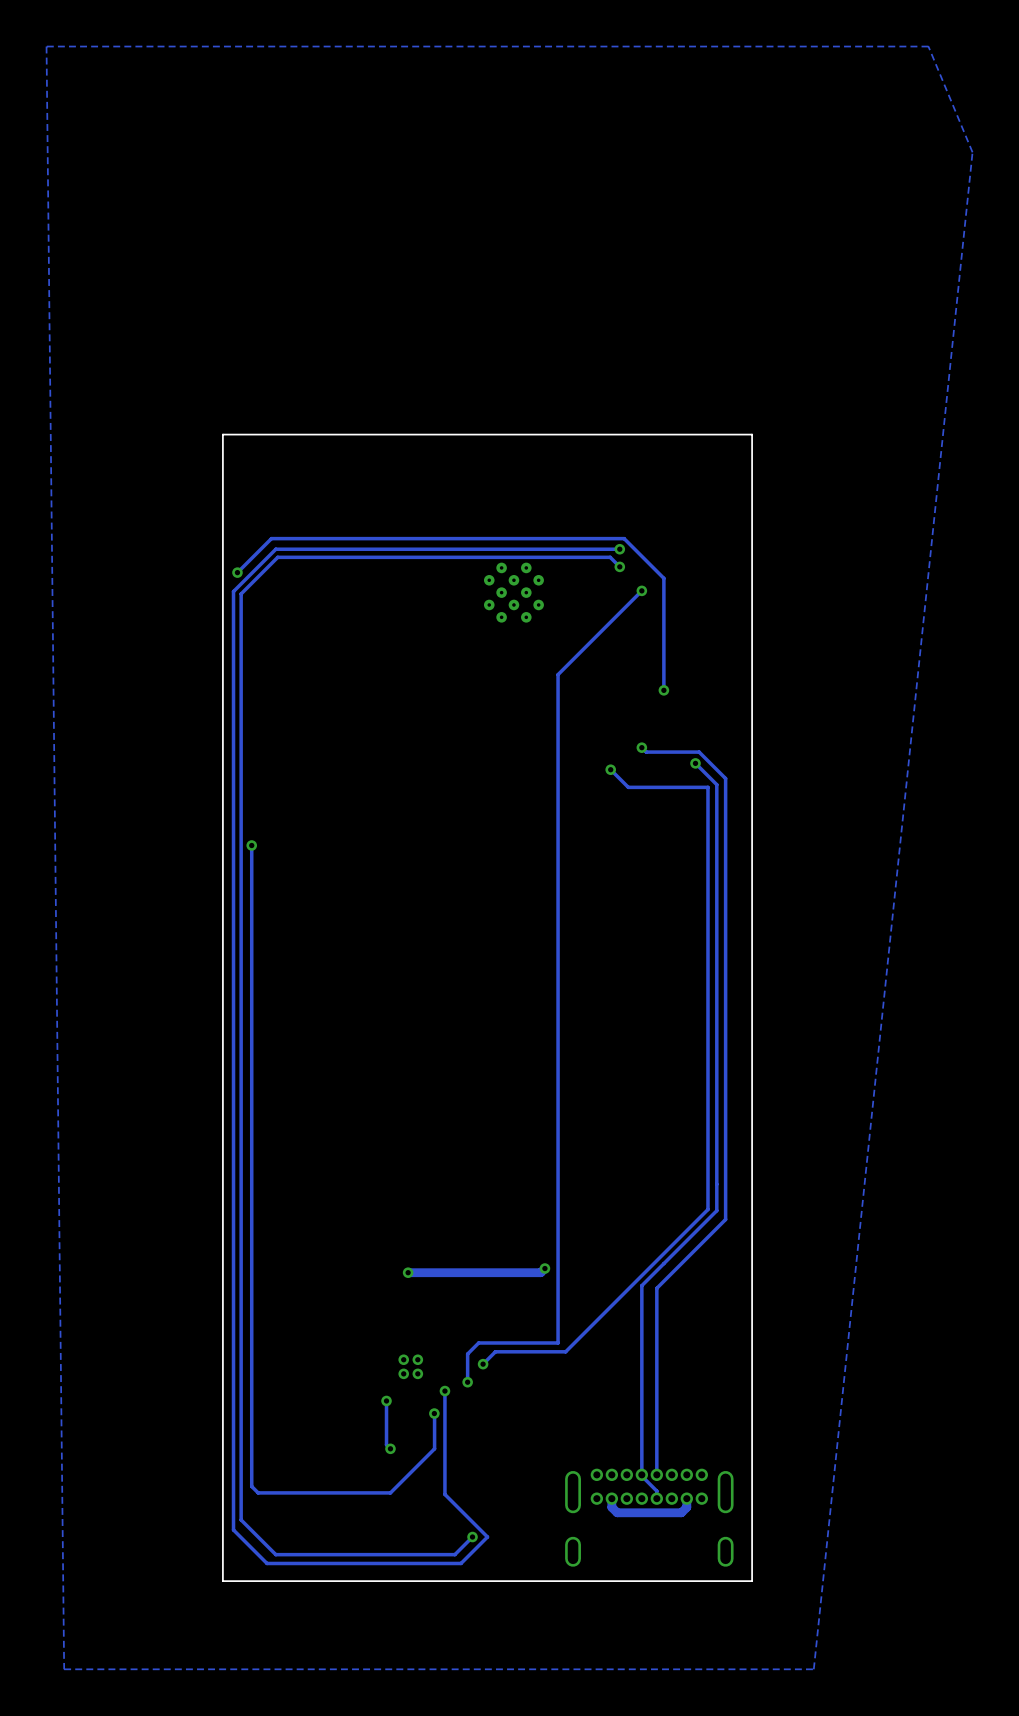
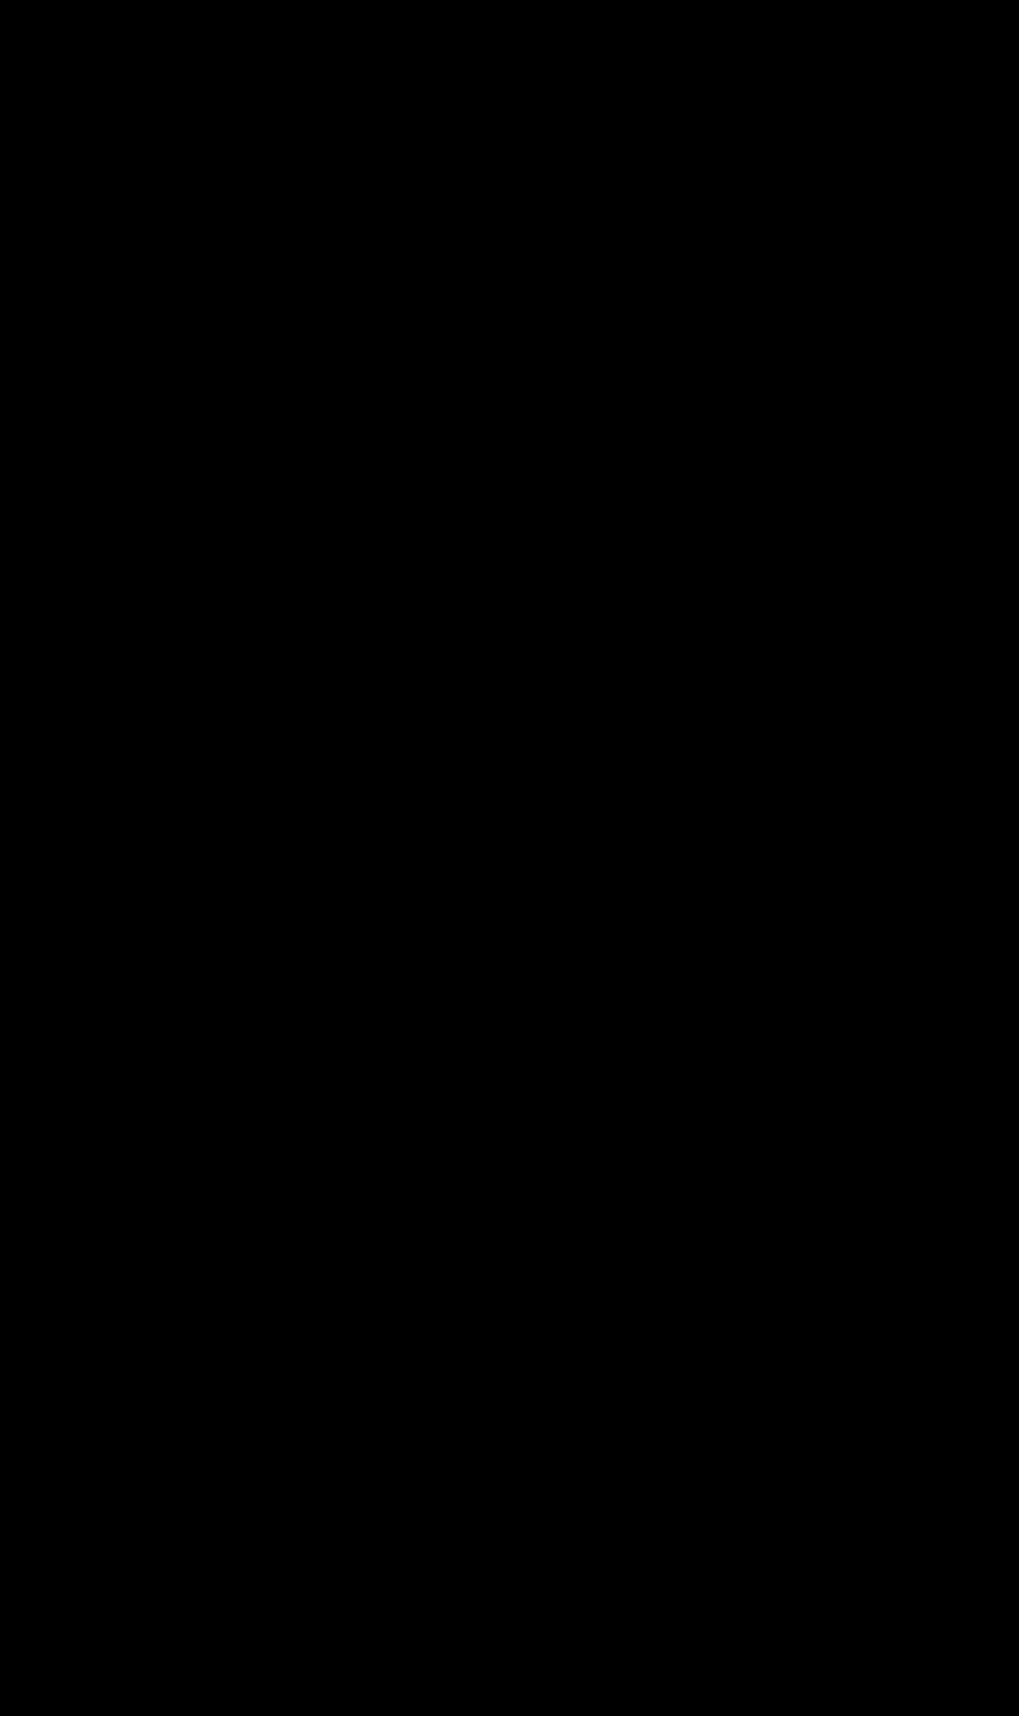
zone outline: (928, 46) (46, 46) (64, 1669) (813, 1669) (972, 152) (928, 46) -> none
board edge: (752, 434) (752, 1581) (222, 1581) (222, 434) (752, 434) -> none
track: (619, 549) (275, 549) (233, 591) (233, 1529) (267, 1563) (461, 1563) (487, 1537) (444, 1494) (444, 1391) -> none
via: (619, 549) -> none
track: (619, 566) (610, 557) (277, 557) (241, 593) (241, 1519) (275, 1554) (454, 1554) (472, 1537) -> none
via: (619, 566) -> none
track: (237, 572) (271, 538) (624, 538) (663, 578) (663, 690) -> none
via: (237, 572) -> none
track: (641, 590) (558, 674) (558, 1342) (478, 1342) (467, 1354) (467, 1382) -> none
via: (641, 590) -> none
part: (513, 592) -> none
via: (663, 690) -> none
track: (641, 747) (646, 752) (699, 752) (725, 778) (725, 1219) (656, 1288) (656, 1474) -> none
via: (641, 747) -> none
track: (695, 763) (716, 784) (716, 1210) (641, 1285) (641, 1476) (656, 1491) (656, 1498) -> none
via: (695, 763) -> none
track: (610, 769) (628, 787) (707, 787) (707, 1209) (565, 1351) (495, 1351) (483, 1364) -> none
via: (610, 769) -> none
track: (251, 845) (251, 1486) (258, 1492) (390, 1492) (434, 1448) (434, 1413) -> none
via: (251, 845) -> none
track: (544, 1268) (540, 1272) (408, 1272) -> none
via: (544, 1268) -> none
via: (408, 1272) -> none
via: (403, 1359) -> none
via: (417, 1359) -> none
via: (483, 1364) -> none
via: (403, 1373) -> none
via: (417, 1373) -> none
via: (467, 1382) -> none
via: (444, 1391) -> none
track: (386, 1400) (386, 1444) (390, 1448) -> none
via: (386, 1400) -> none
via: (434, 1413) -> none
via: (390, 1448) -> none
track: (686, 1498) (686, 1507) (681, 1512) (617, 1512) (611, 1507) (611, 1498) -> none
part: (649, 1517) -> none
via: (472, 1537) -> none

